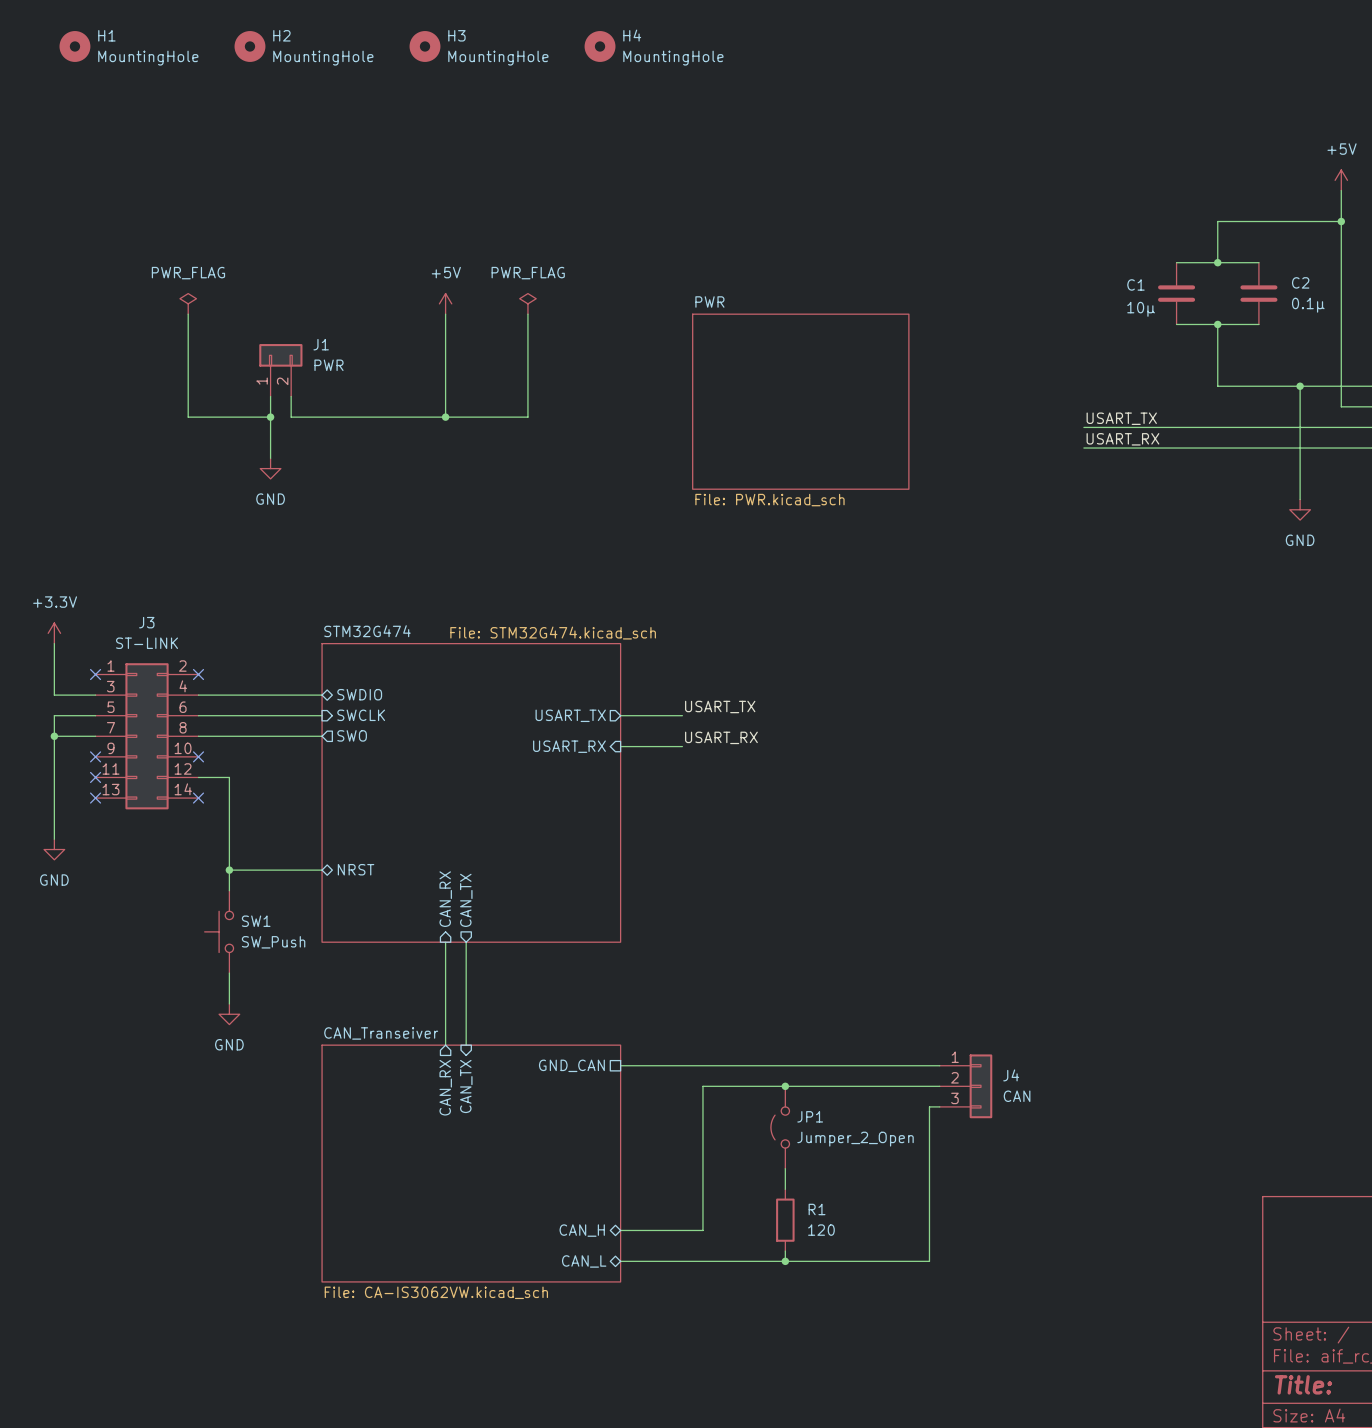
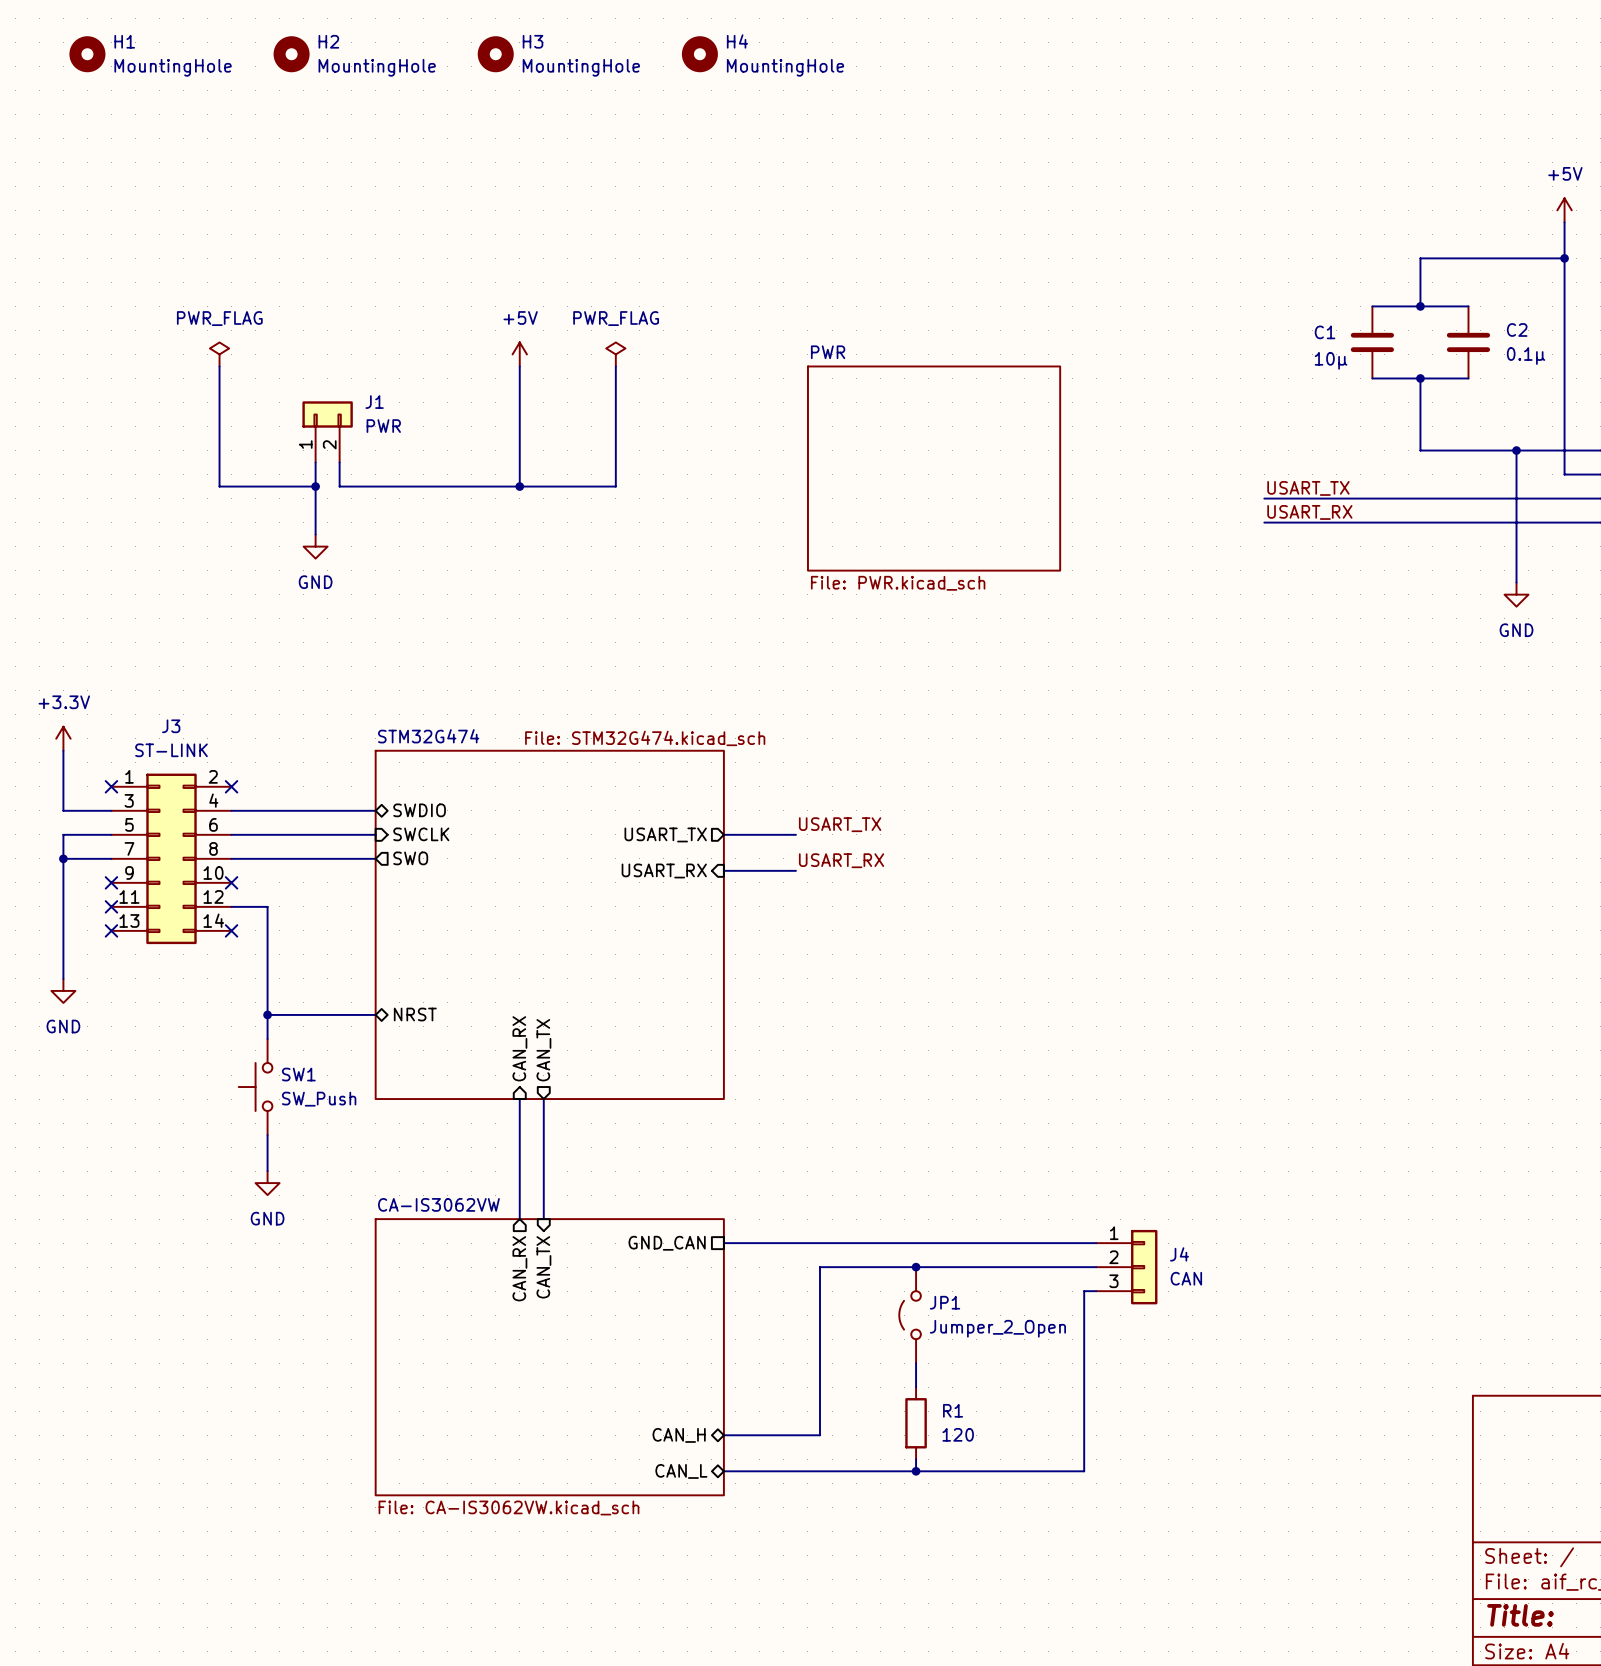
sheet CAN_Transeiver name: CAN_Transeiver (381, 1033) -> CA-IS3062VW (438, 1204)

